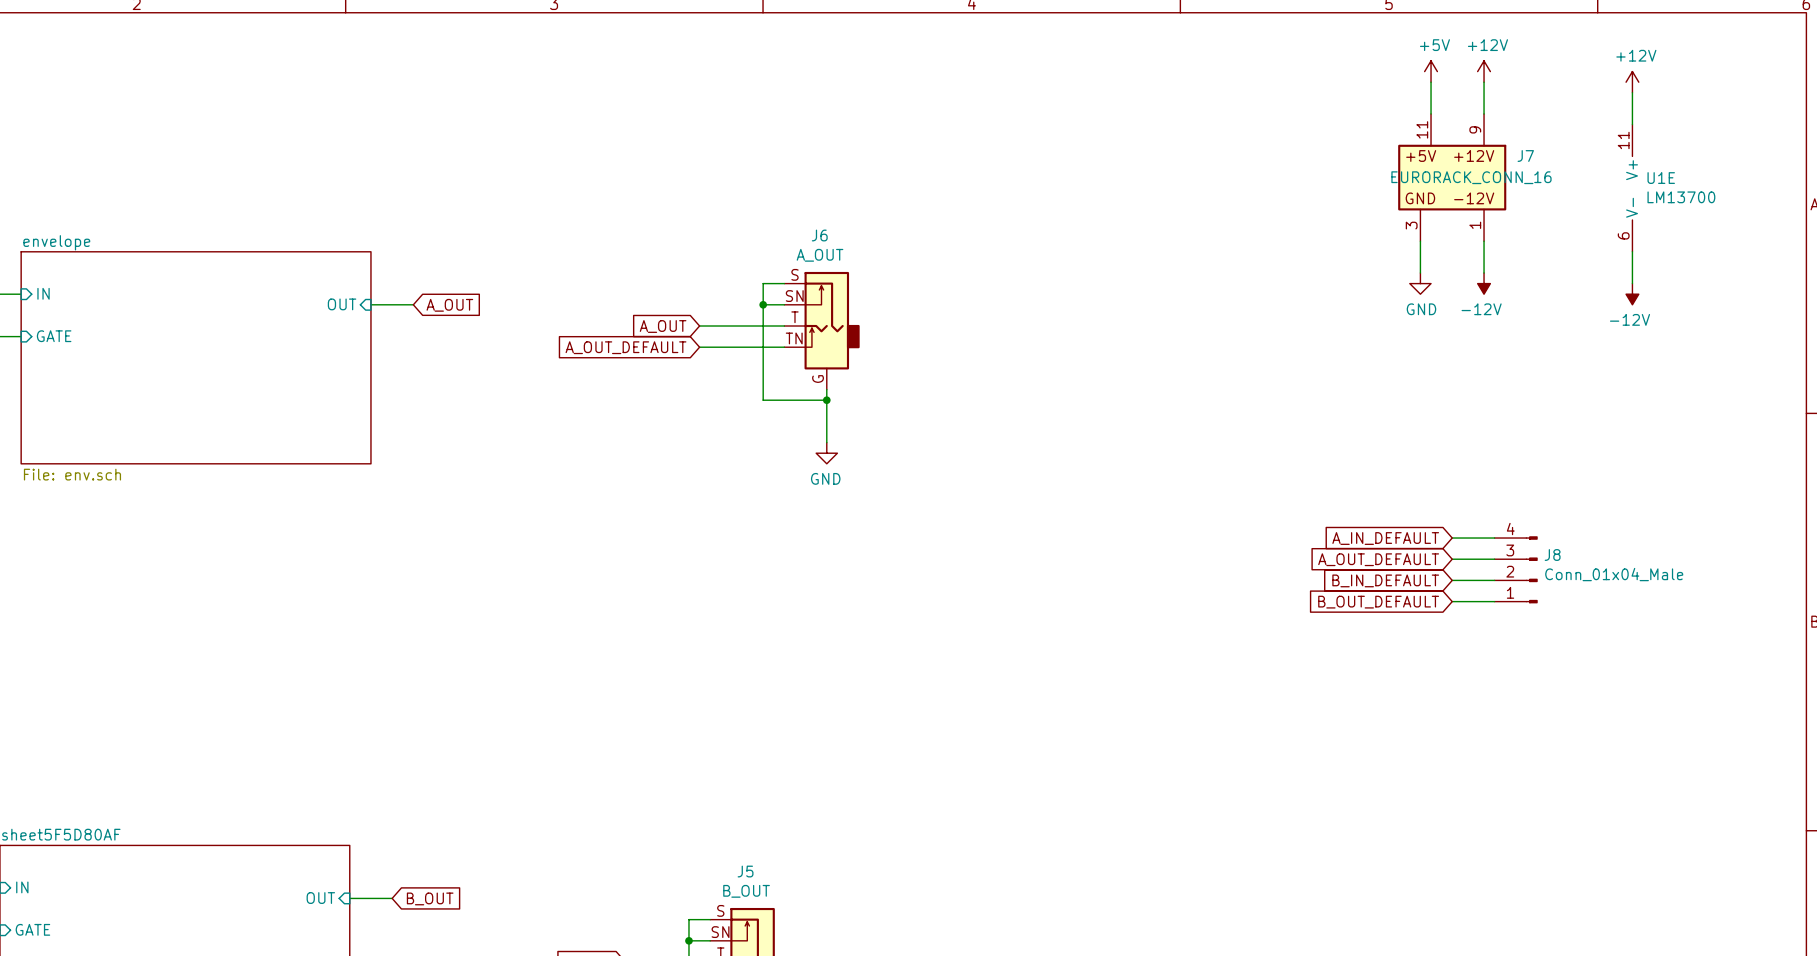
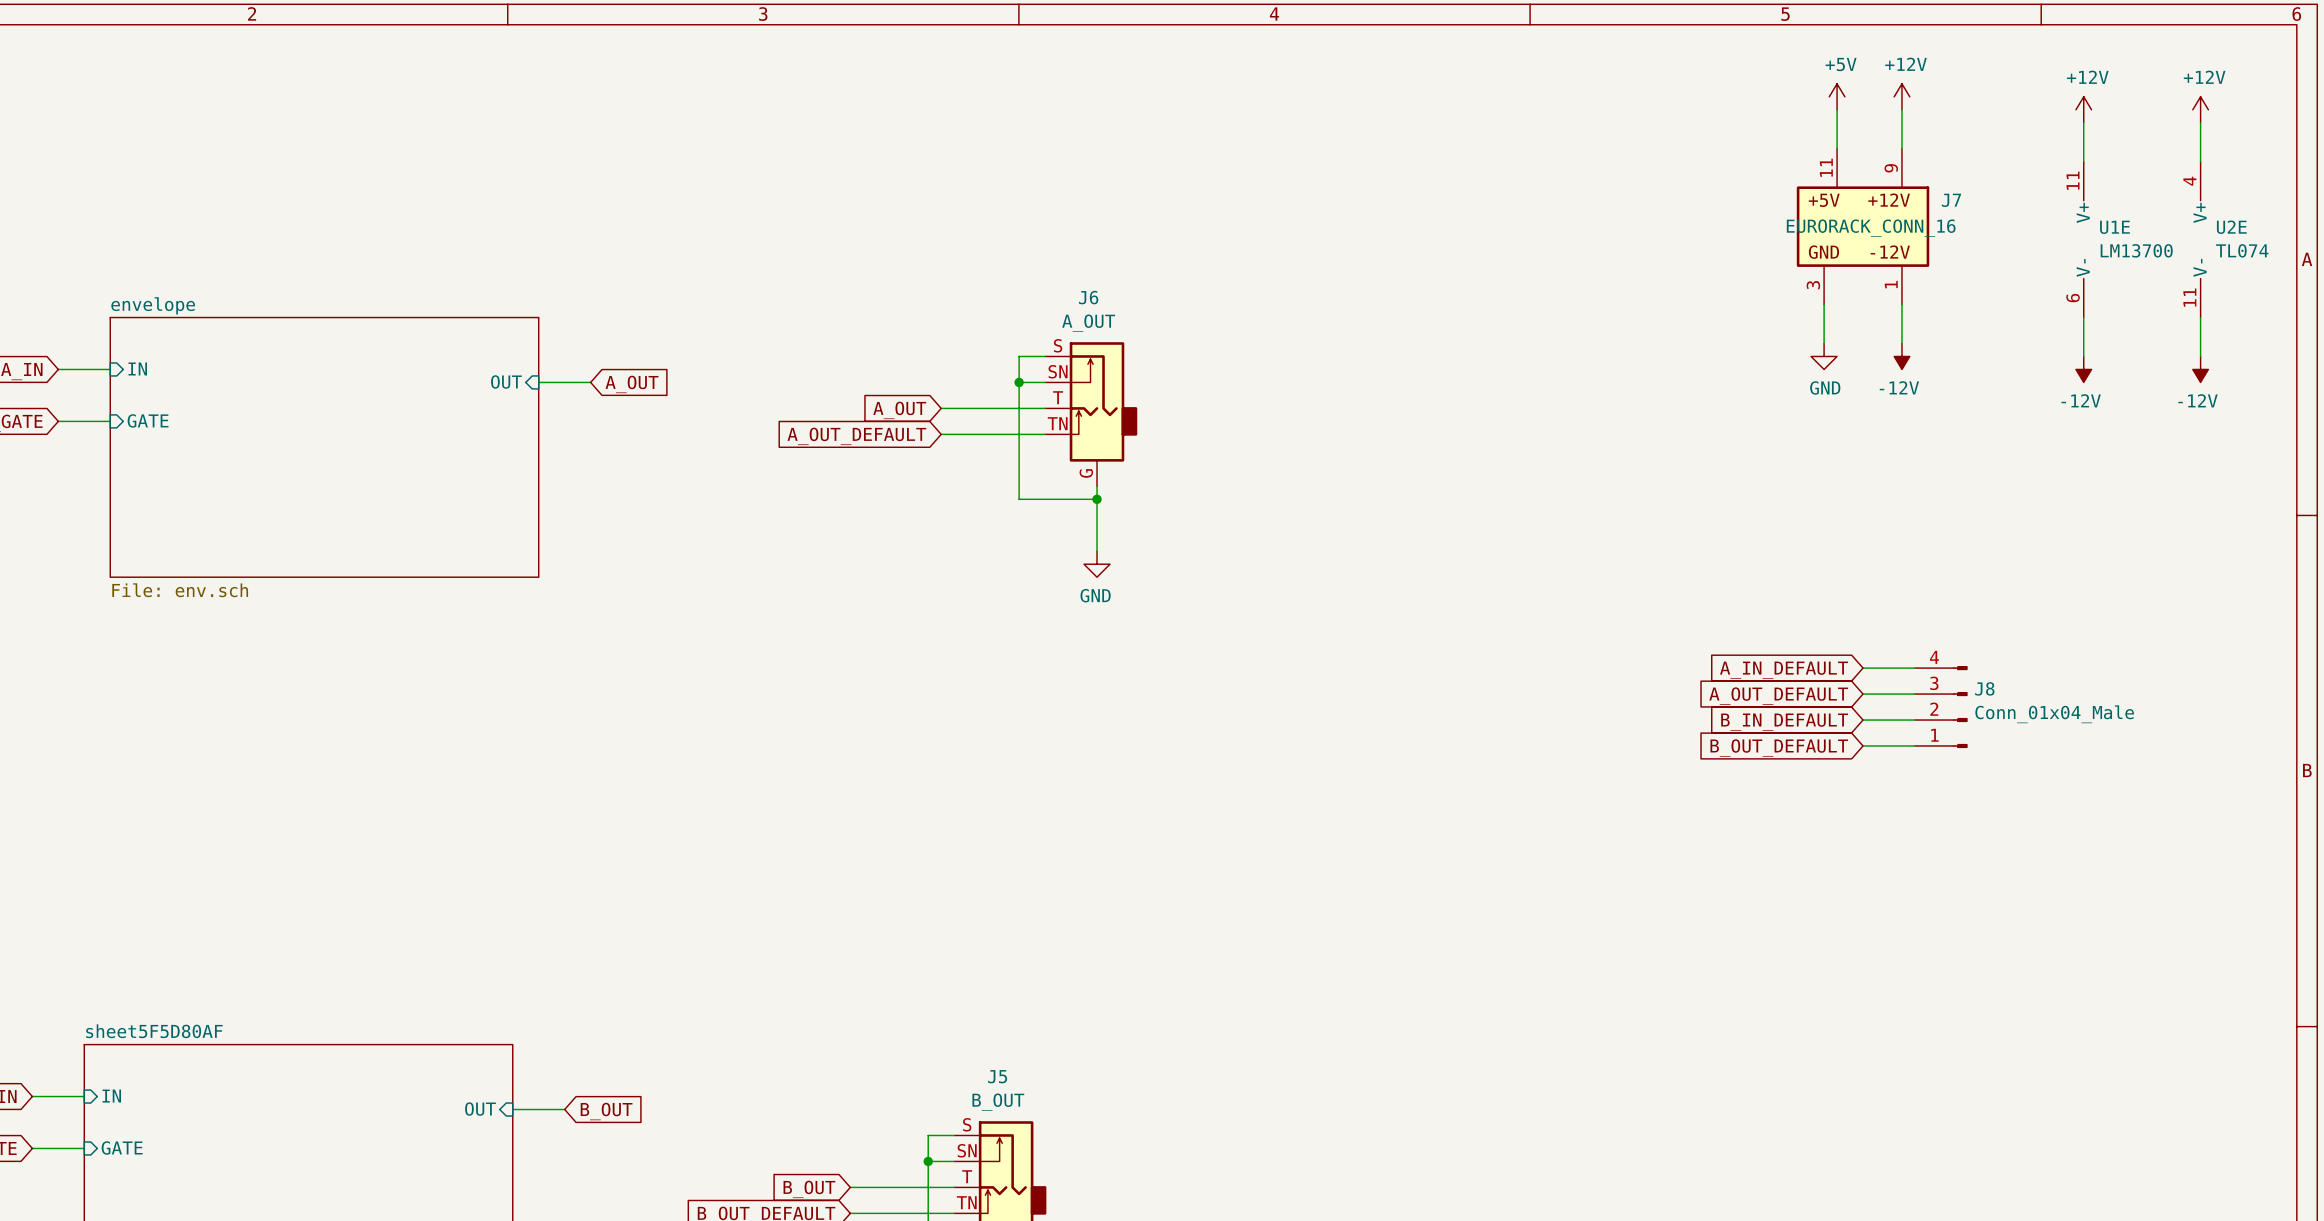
power symbol: none -> +12V (2200, 109)
wire: none -> (2200, 122) (2200, 161)
U2E: none -> TL074 (2200, 239)
wire: none -> (2200, 317) (2200, 356)
power symbol: none -> -12V (2200, 369)

